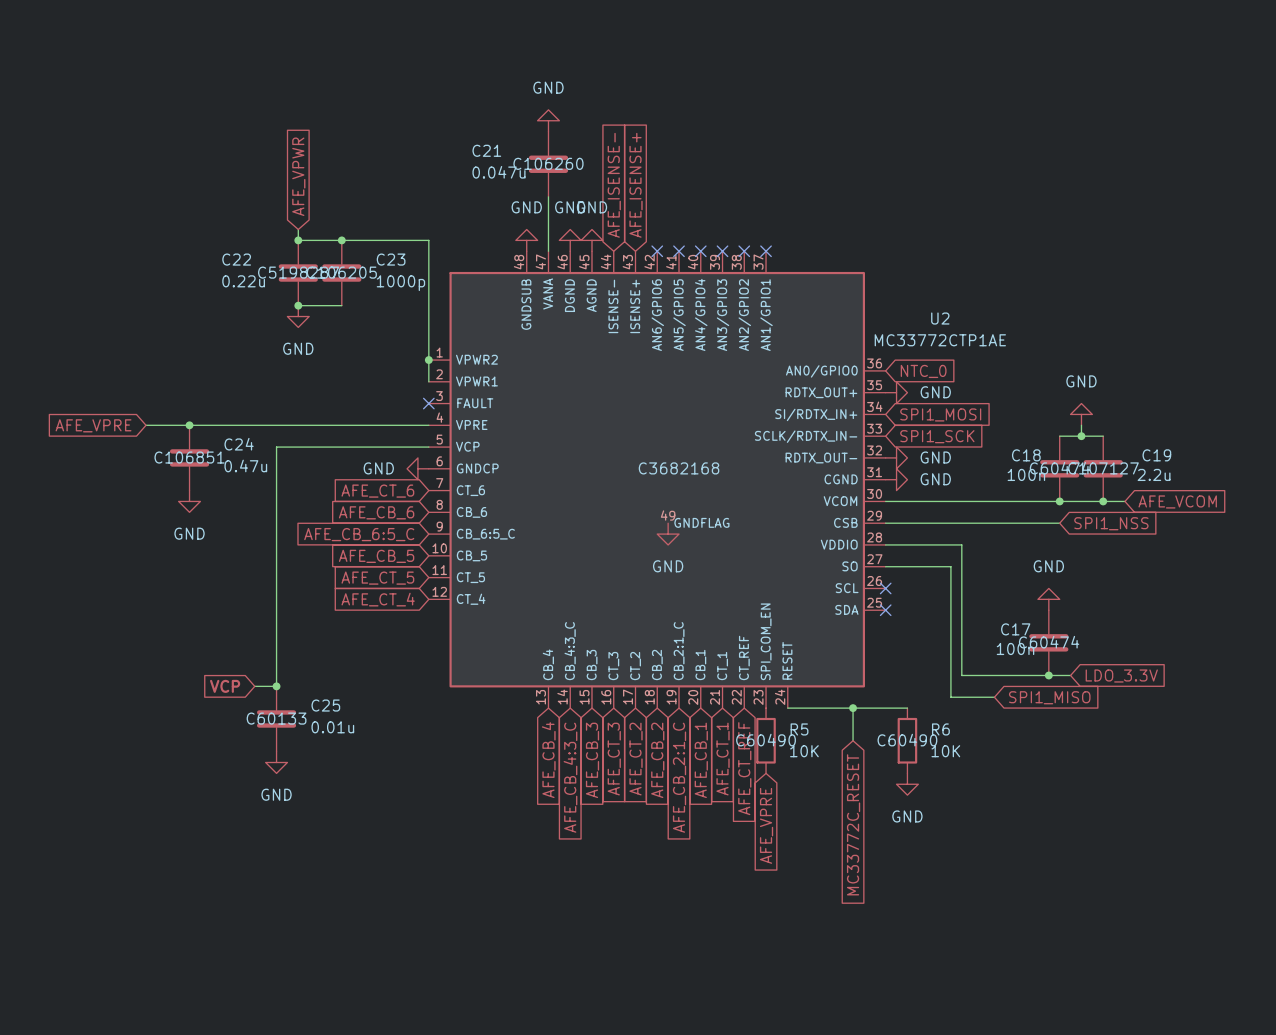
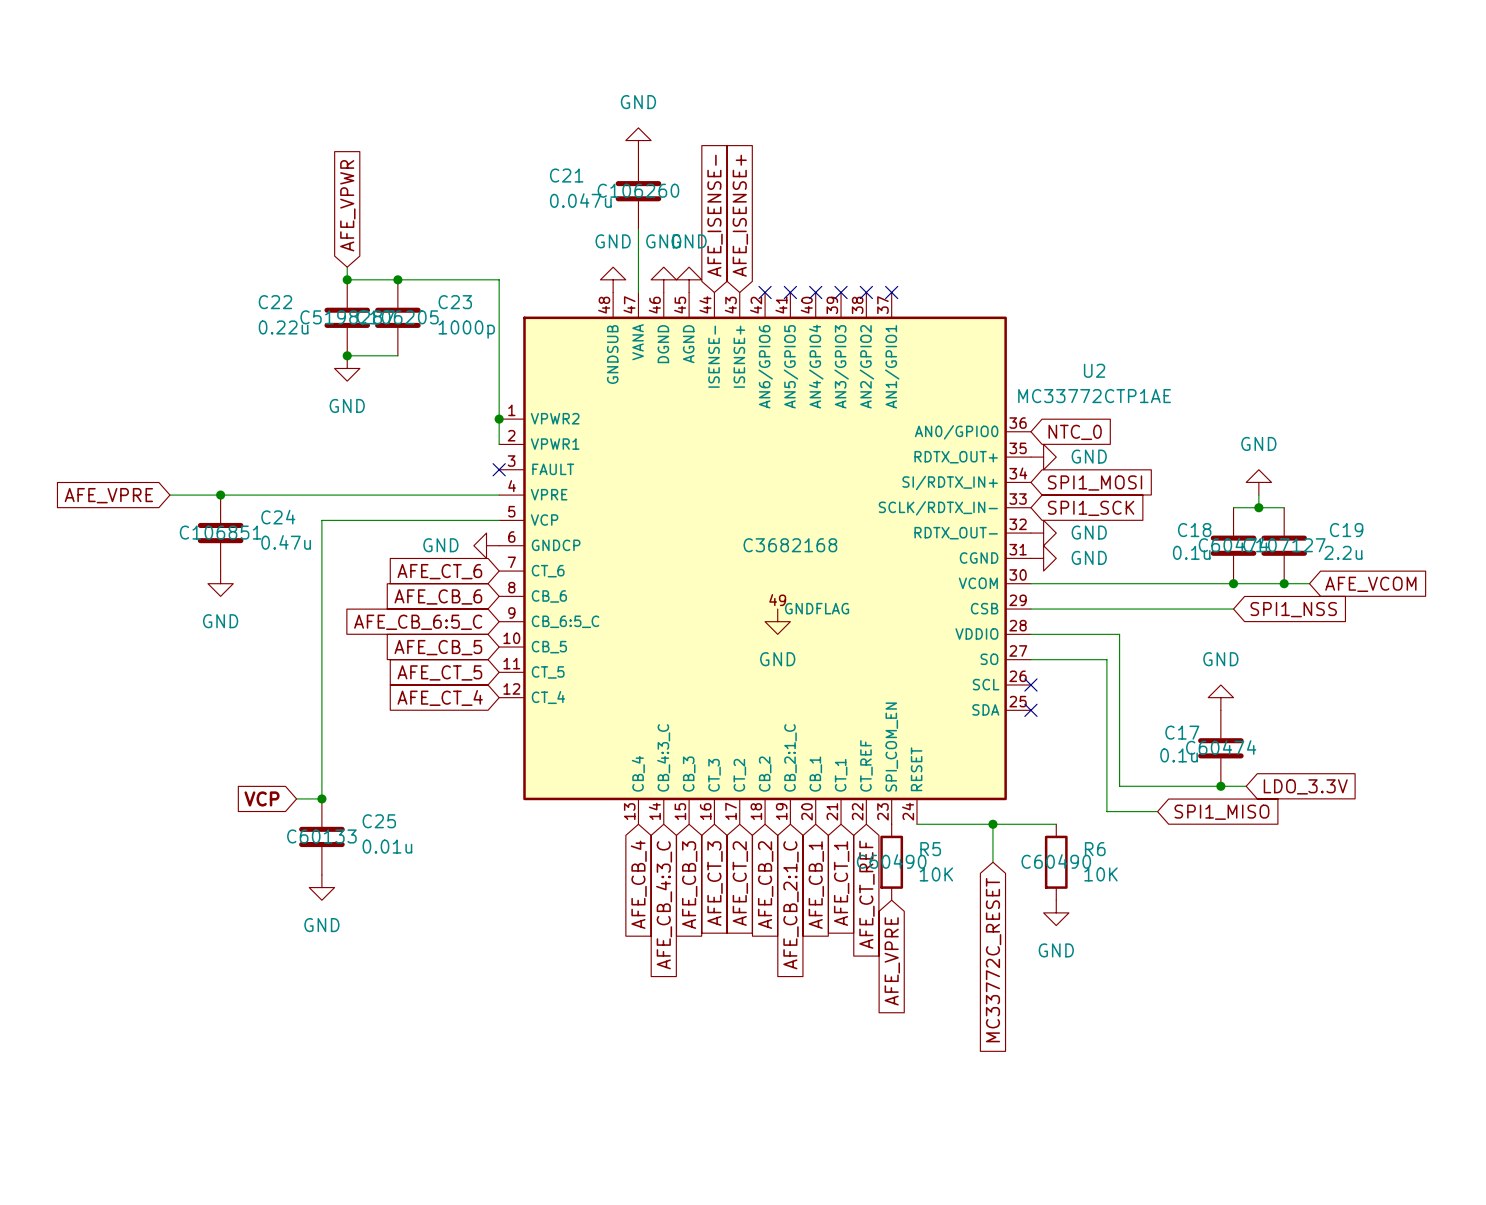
C18 value: 100n (1026, 474) -> 0.1u (1191, 552)
C17 value: 100n (1015, 648) -> 0.1u (1179, 755)

